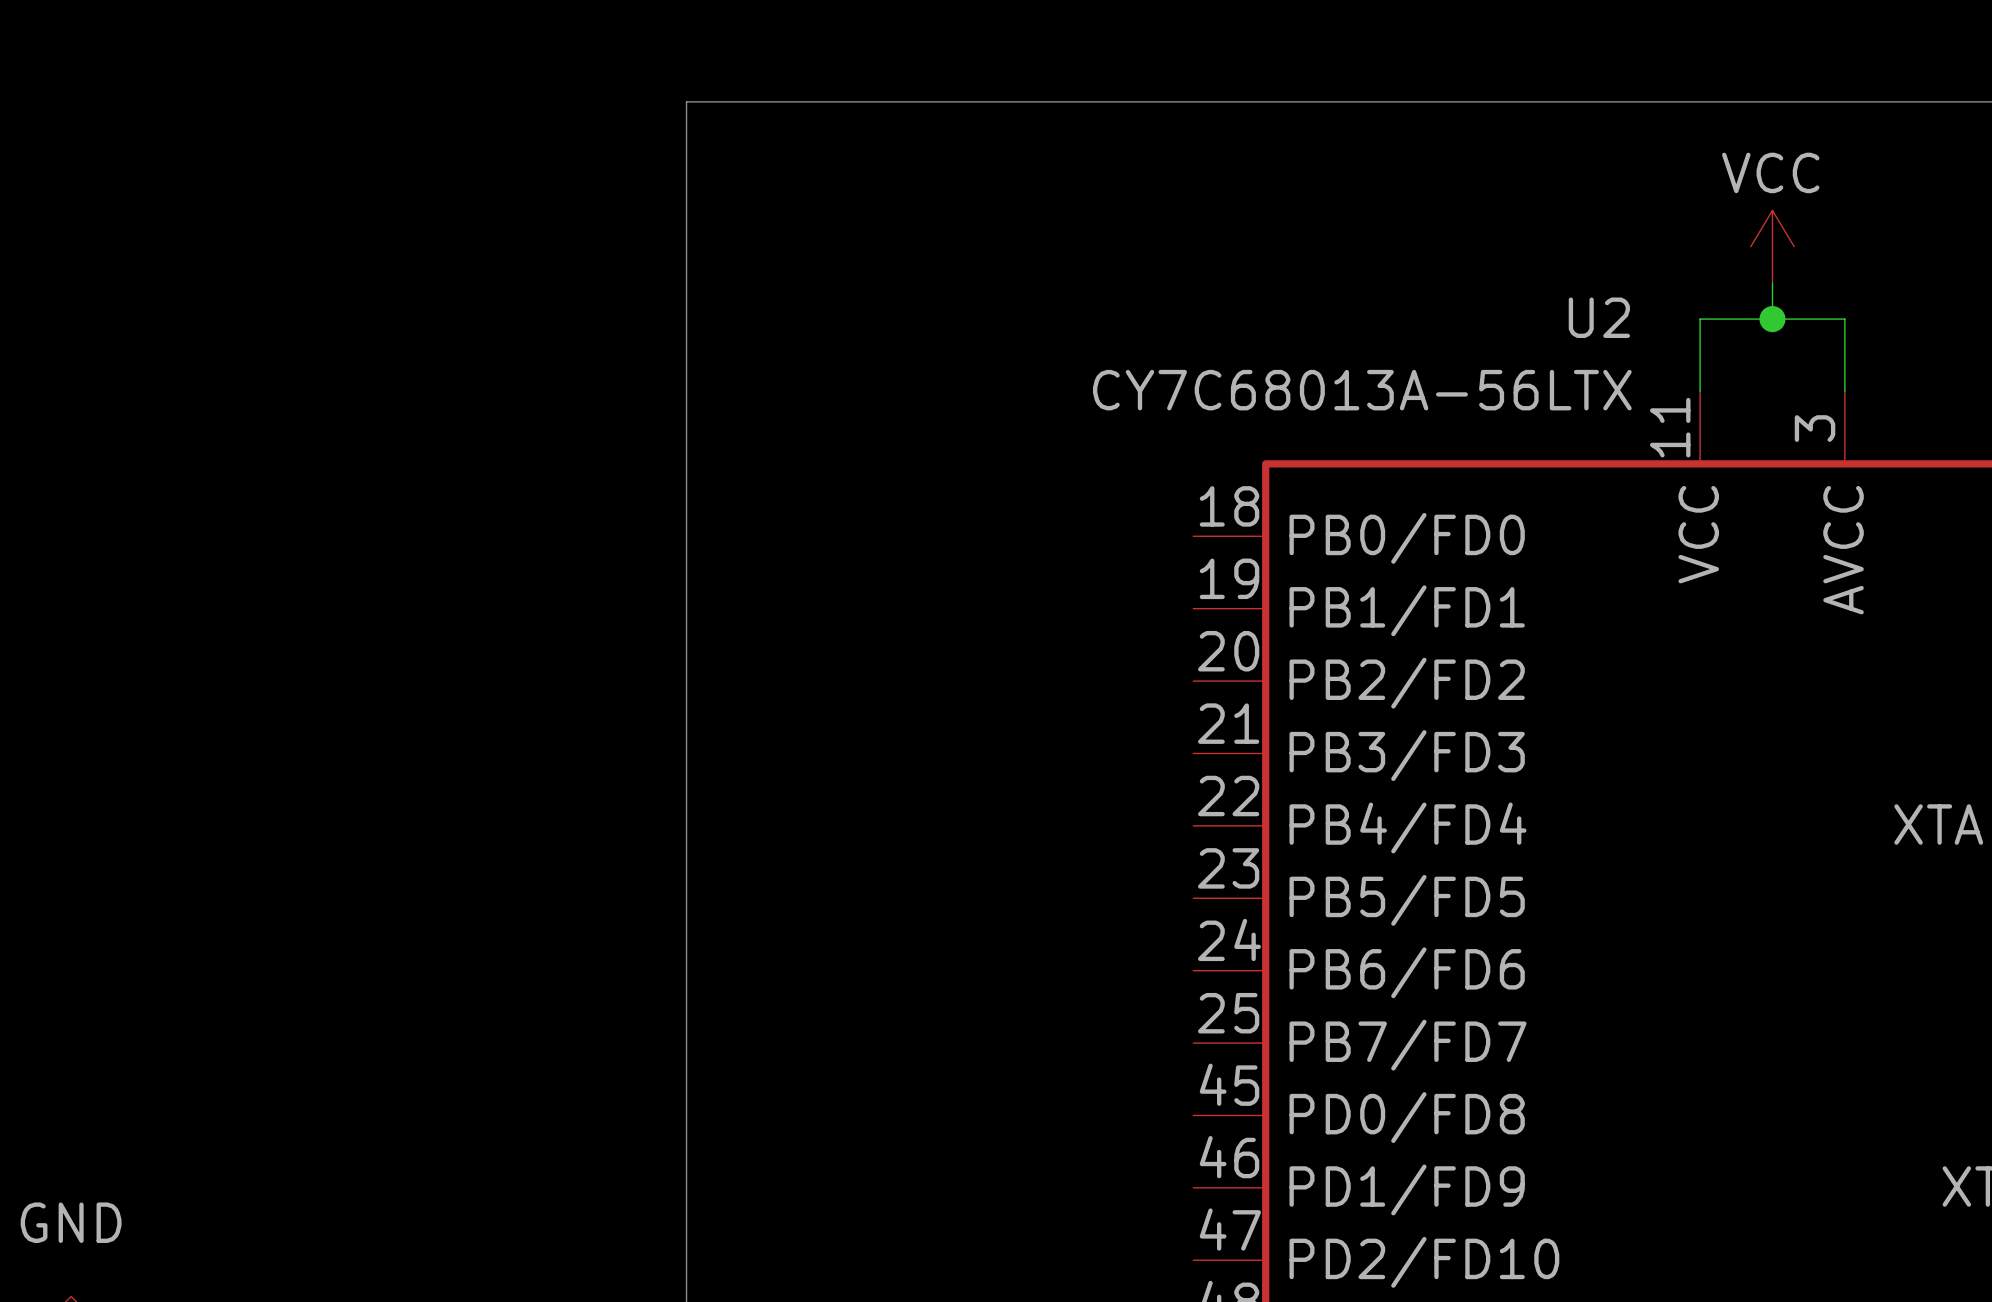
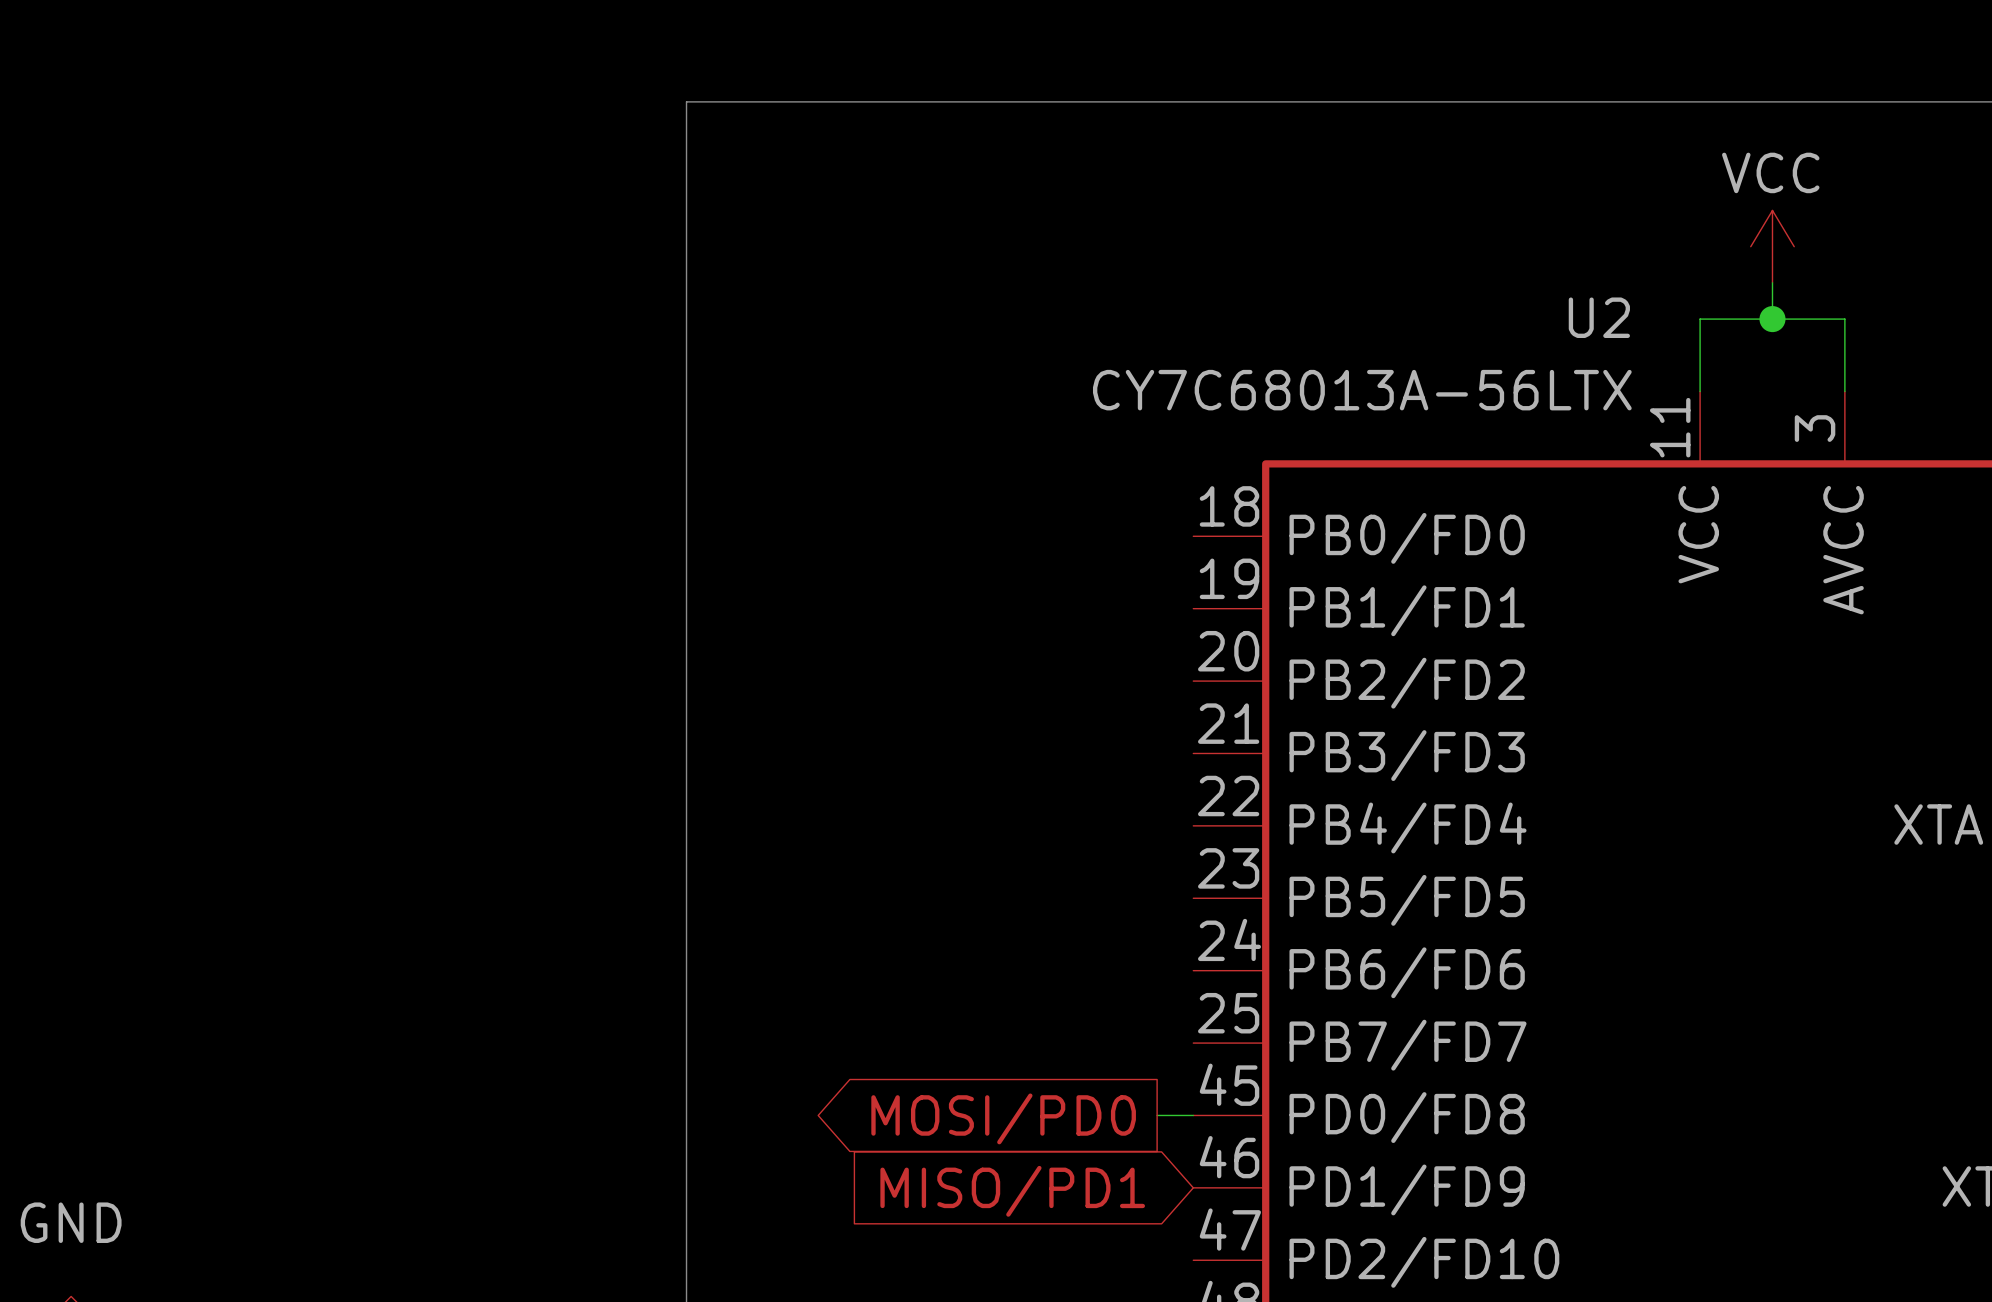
wire: none -> (1157, 1115) (1193, 1115)
global label: none -> MOSI/PD0 (1003, 1118)
global label: none -> MISO/PD1 (1012, 1191)

